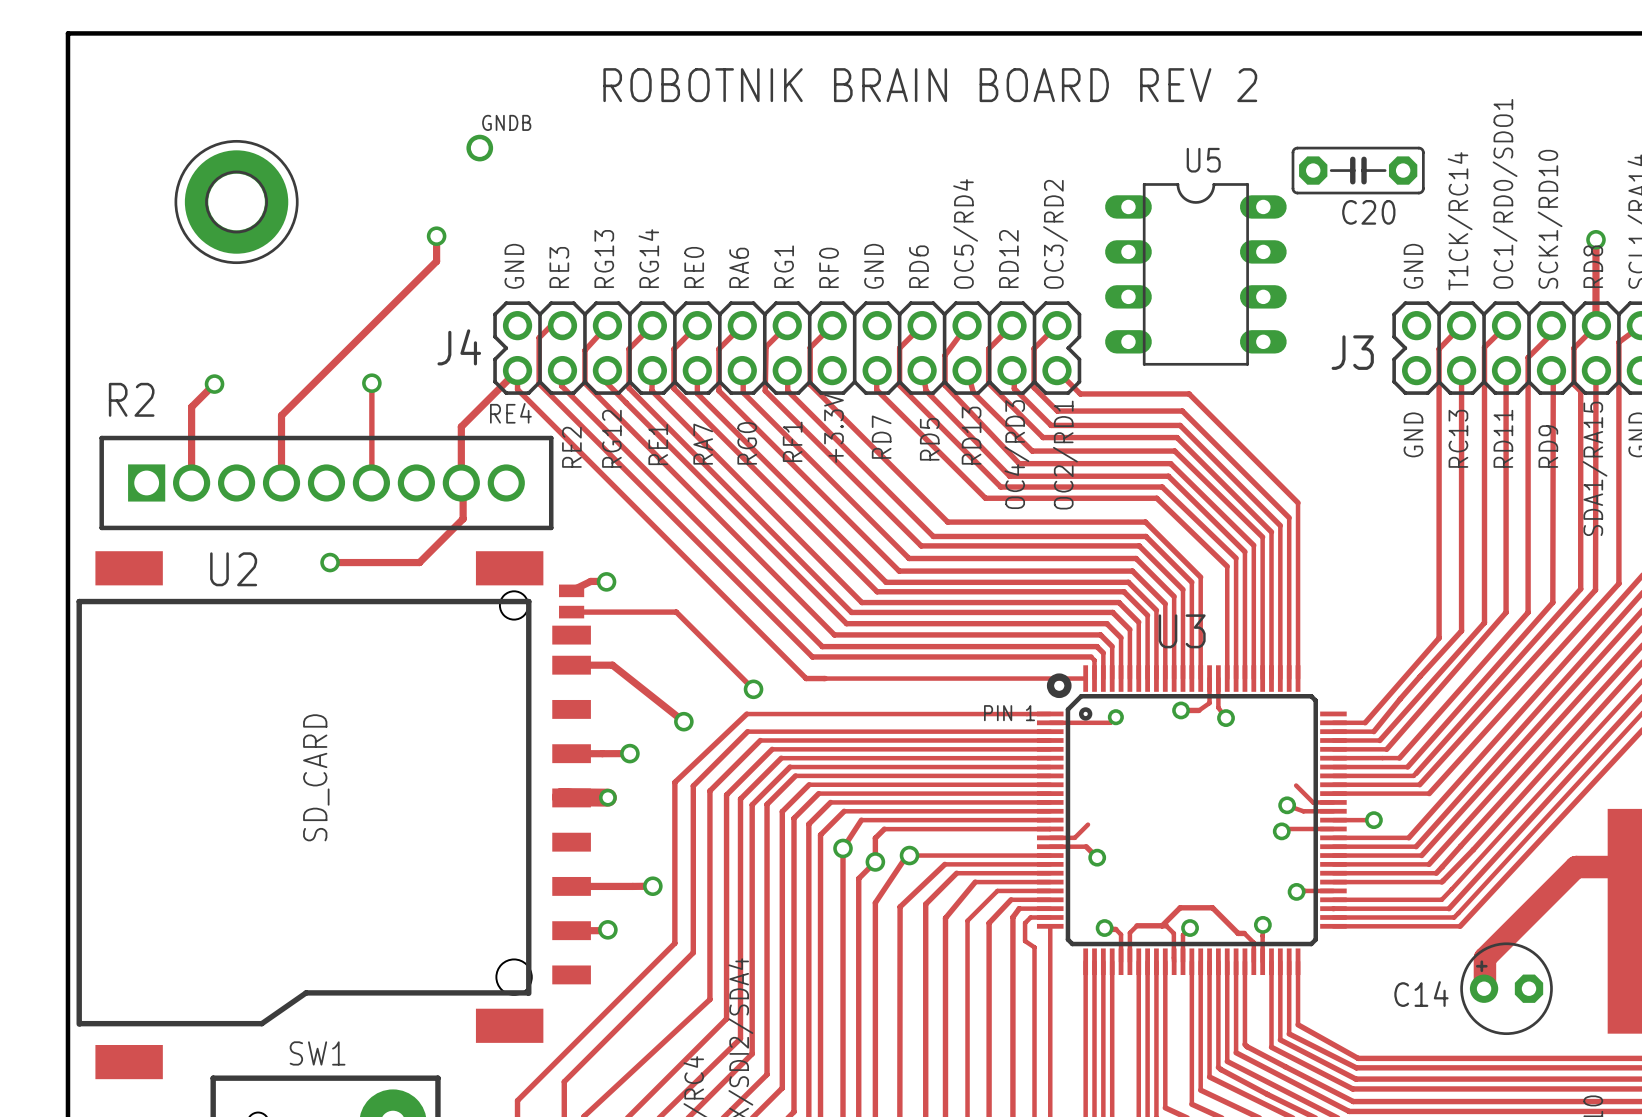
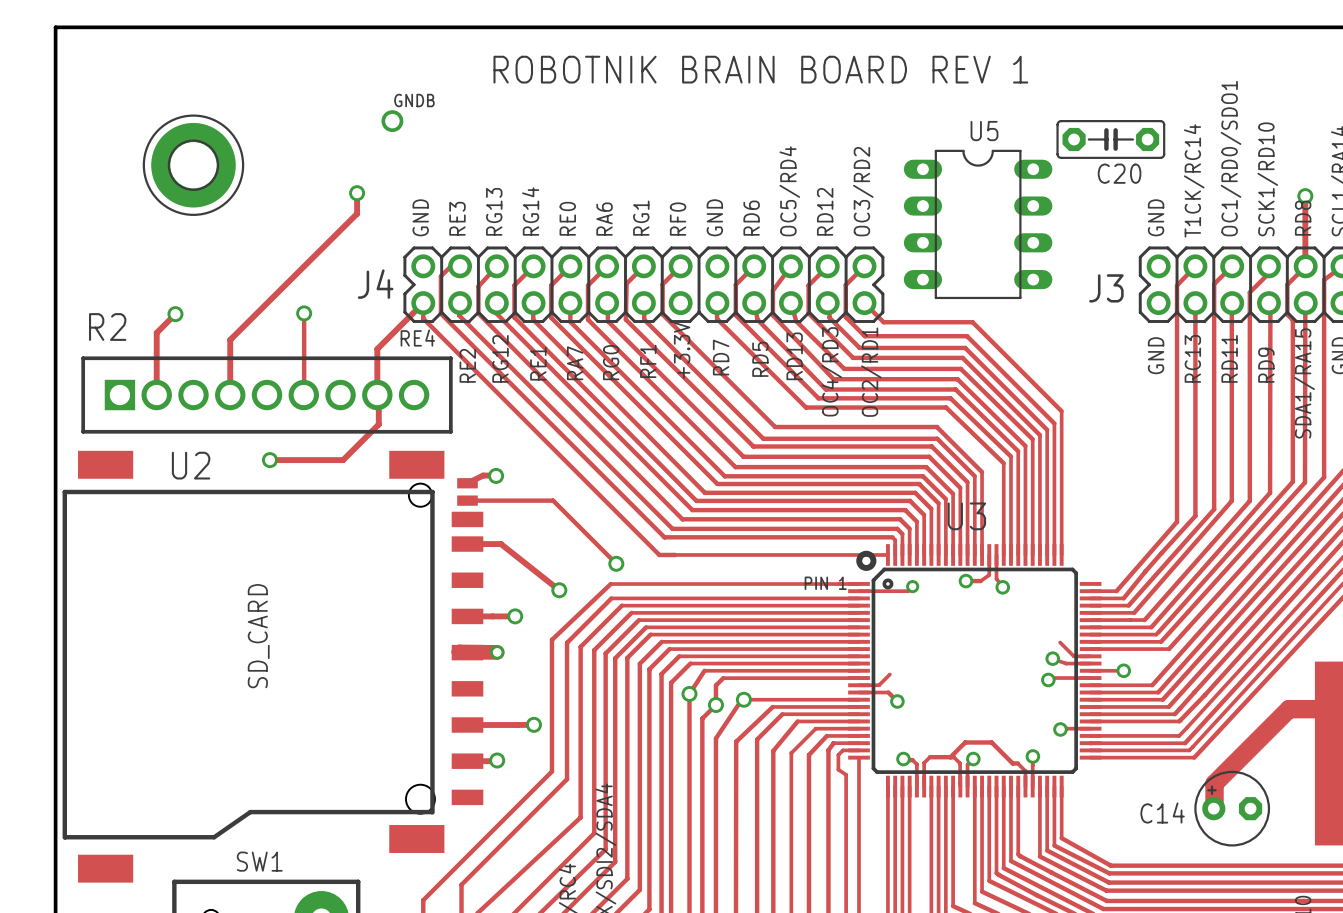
text: ROBOTNIK BRAIN BOARD REV 2 (930, 85) -> ROBOTNIK BRAIN BOARD REV 1 (760, 69)

